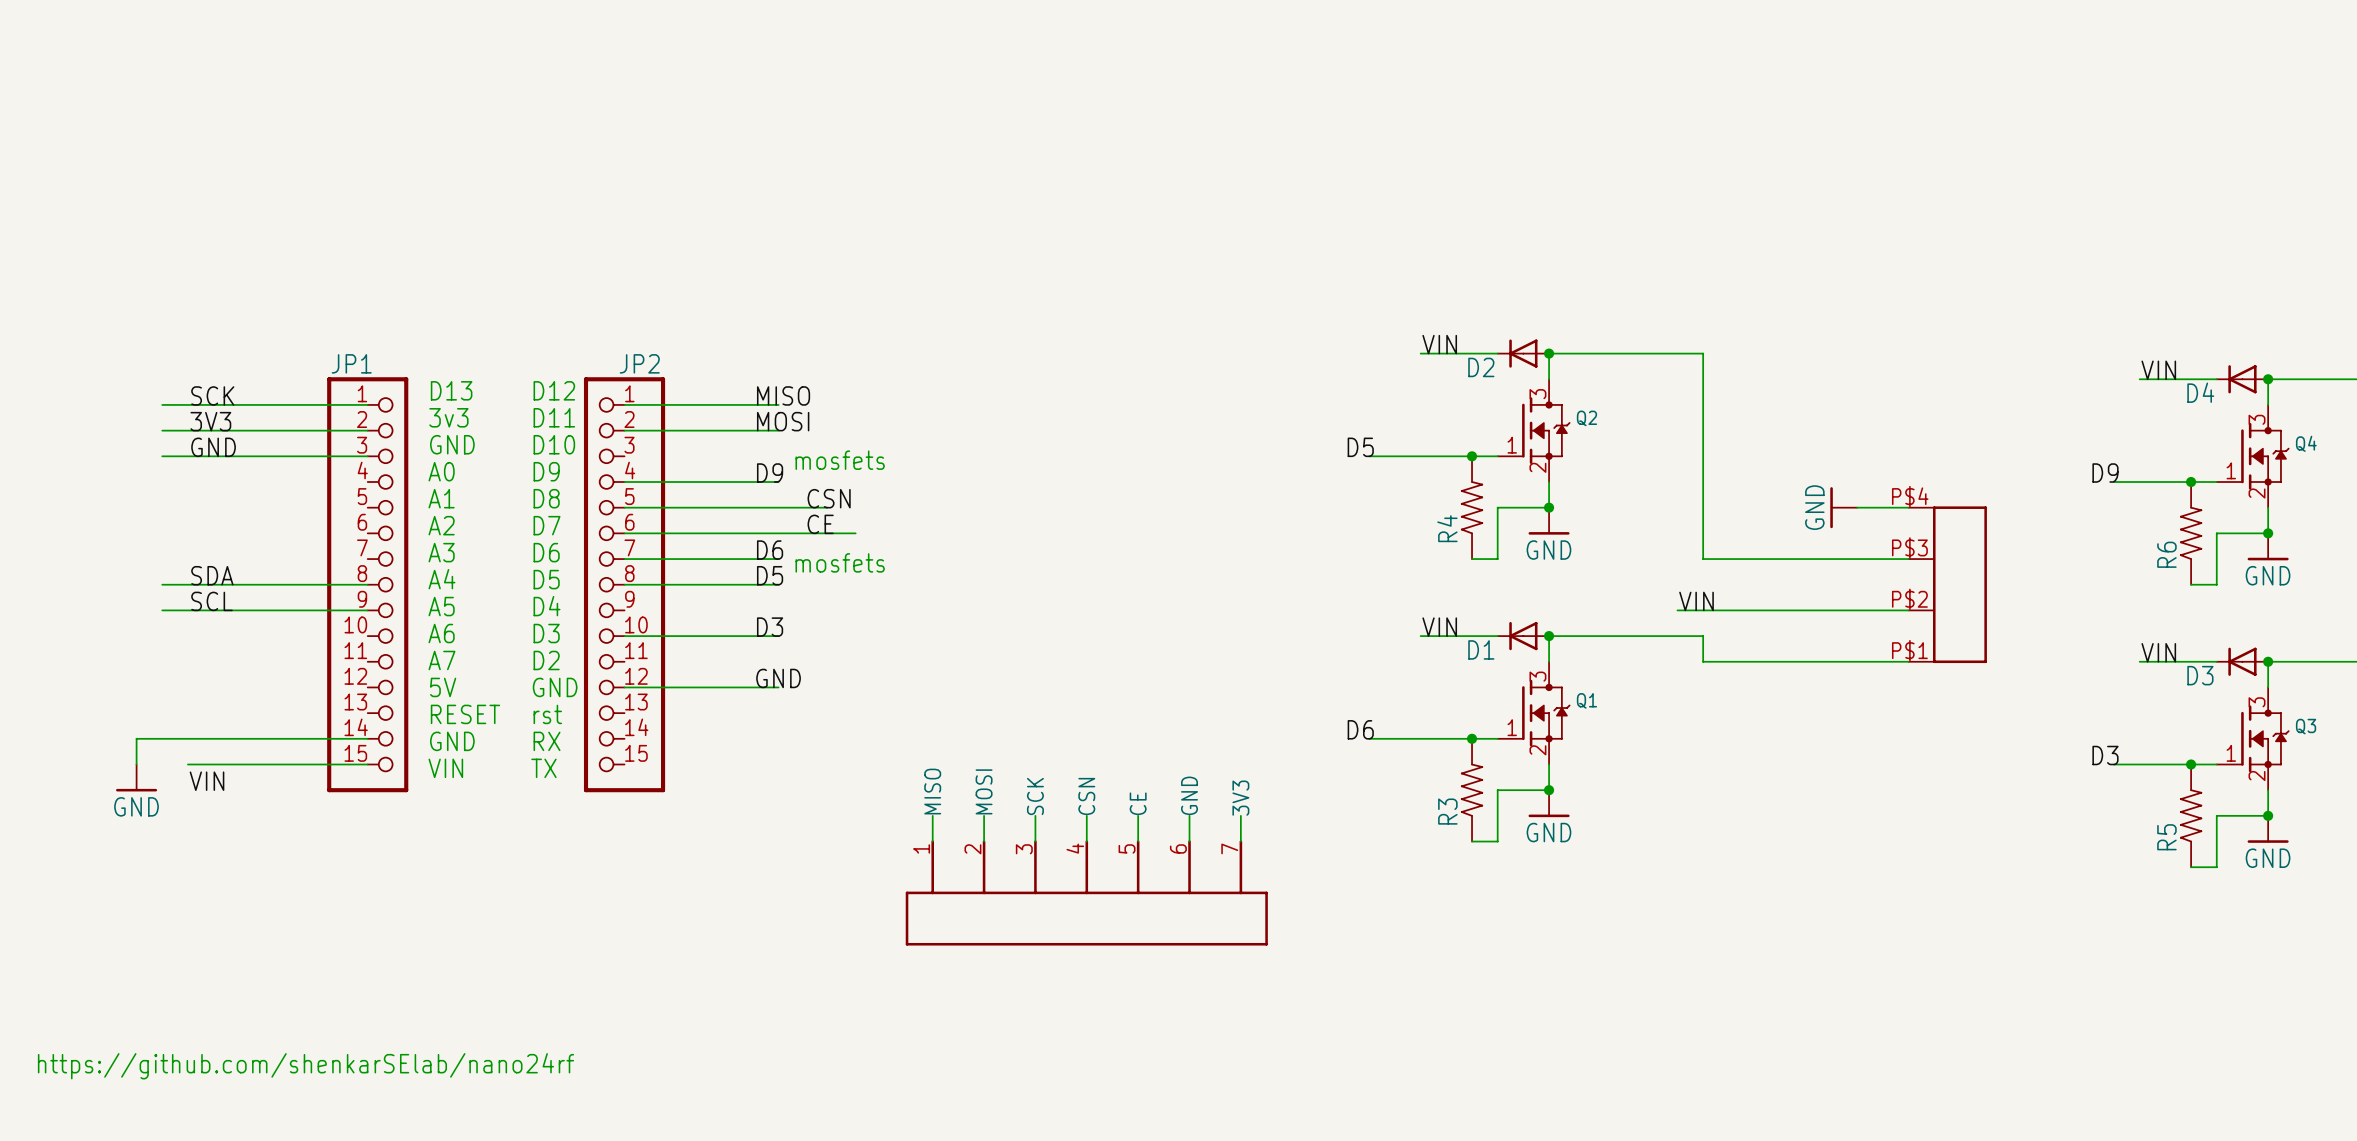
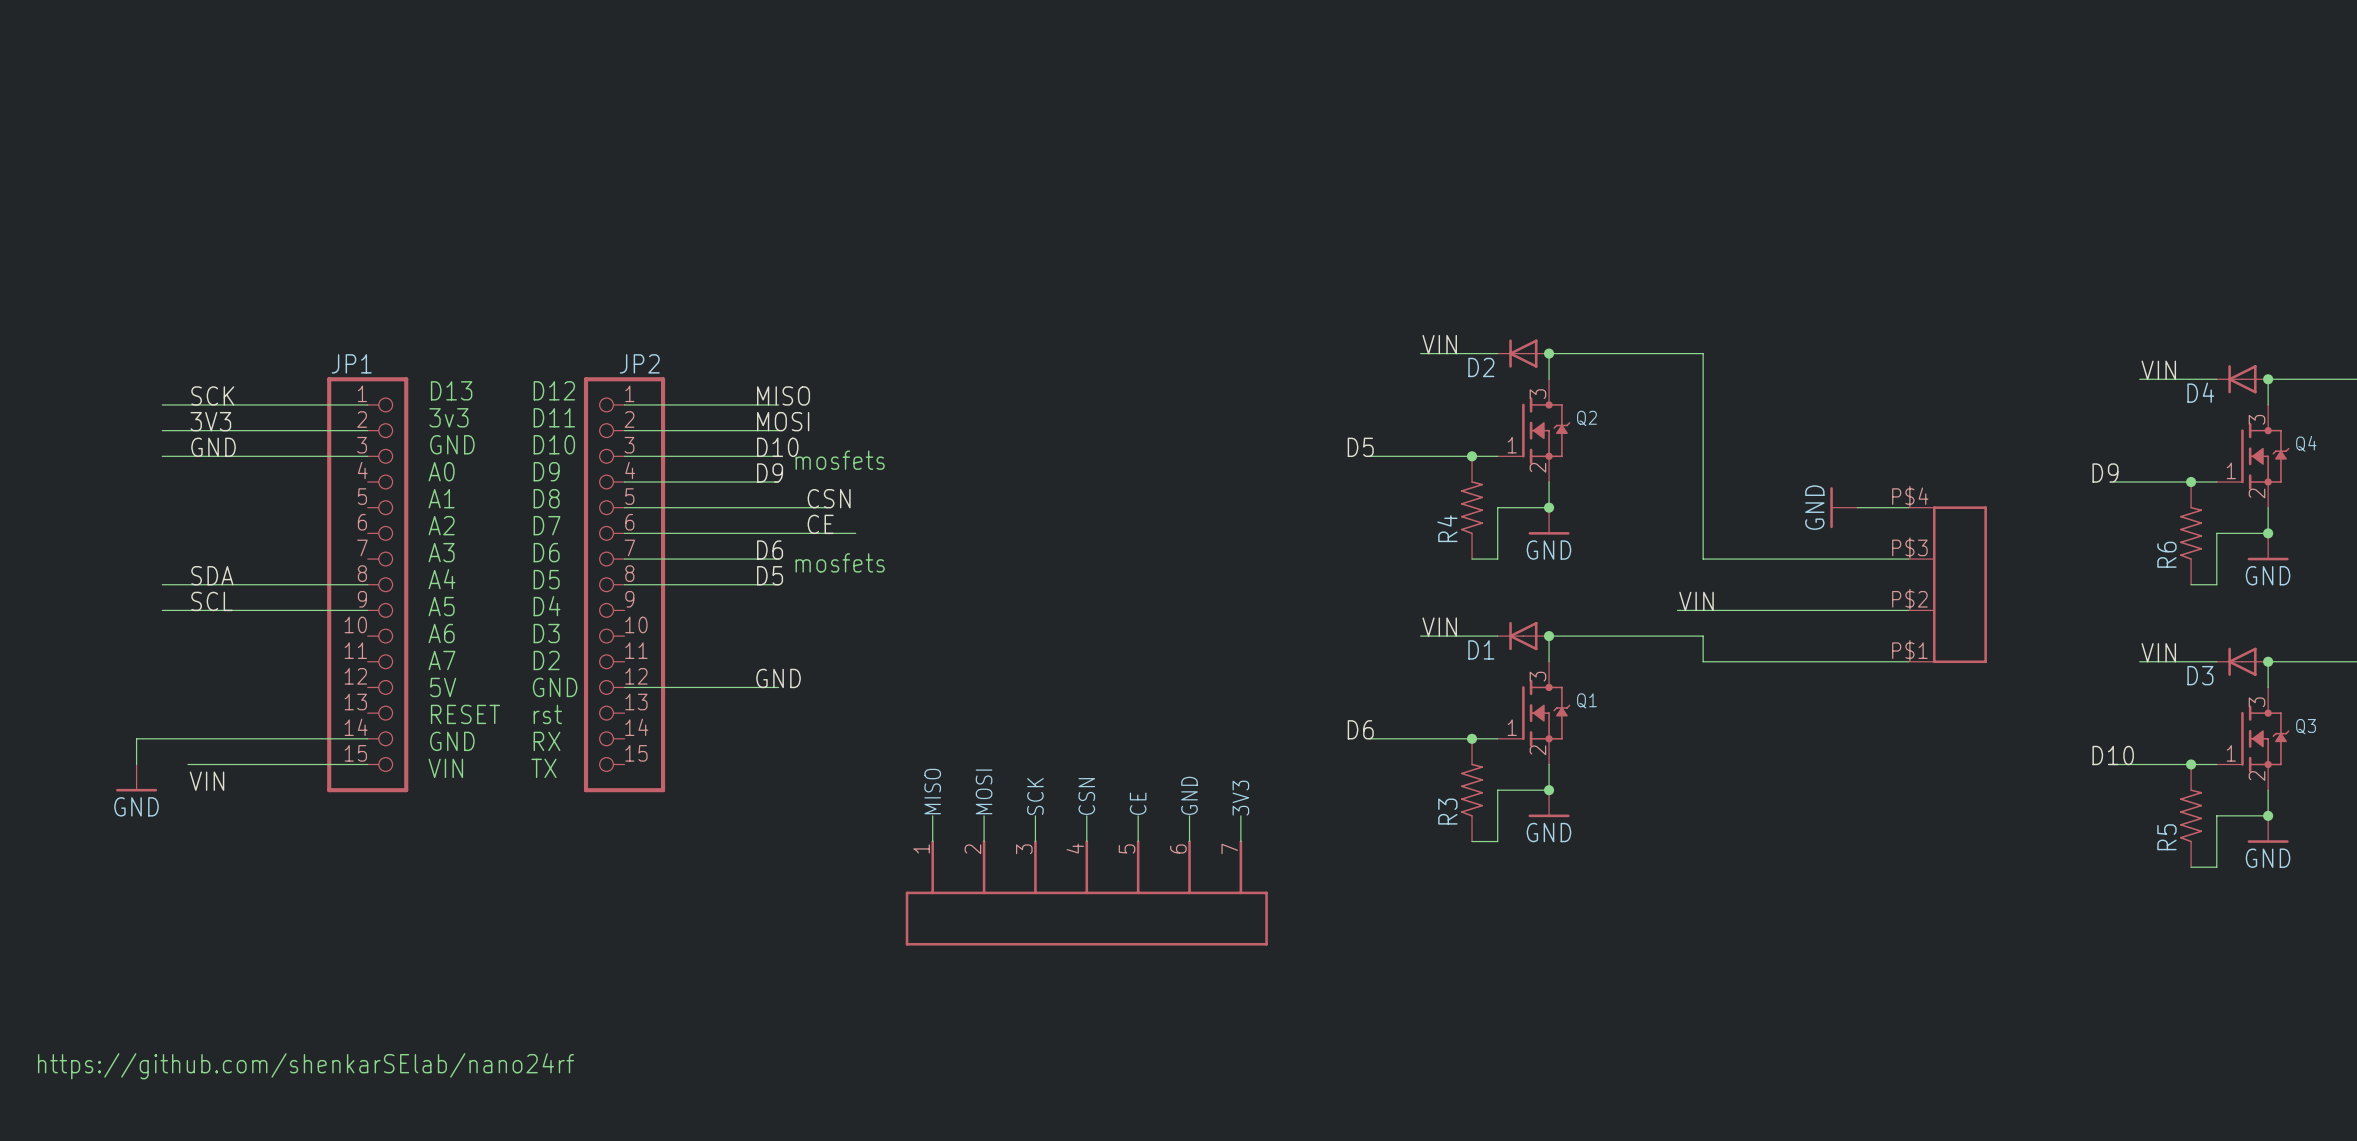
label: none -> D10 (777, 447)
label: D3 (770, 627) -> none
wire: (624, 636) (778, 636) -> (624, 456) (778, 456)
label: D3 (2105, 755) -> D10 (2113, 755)

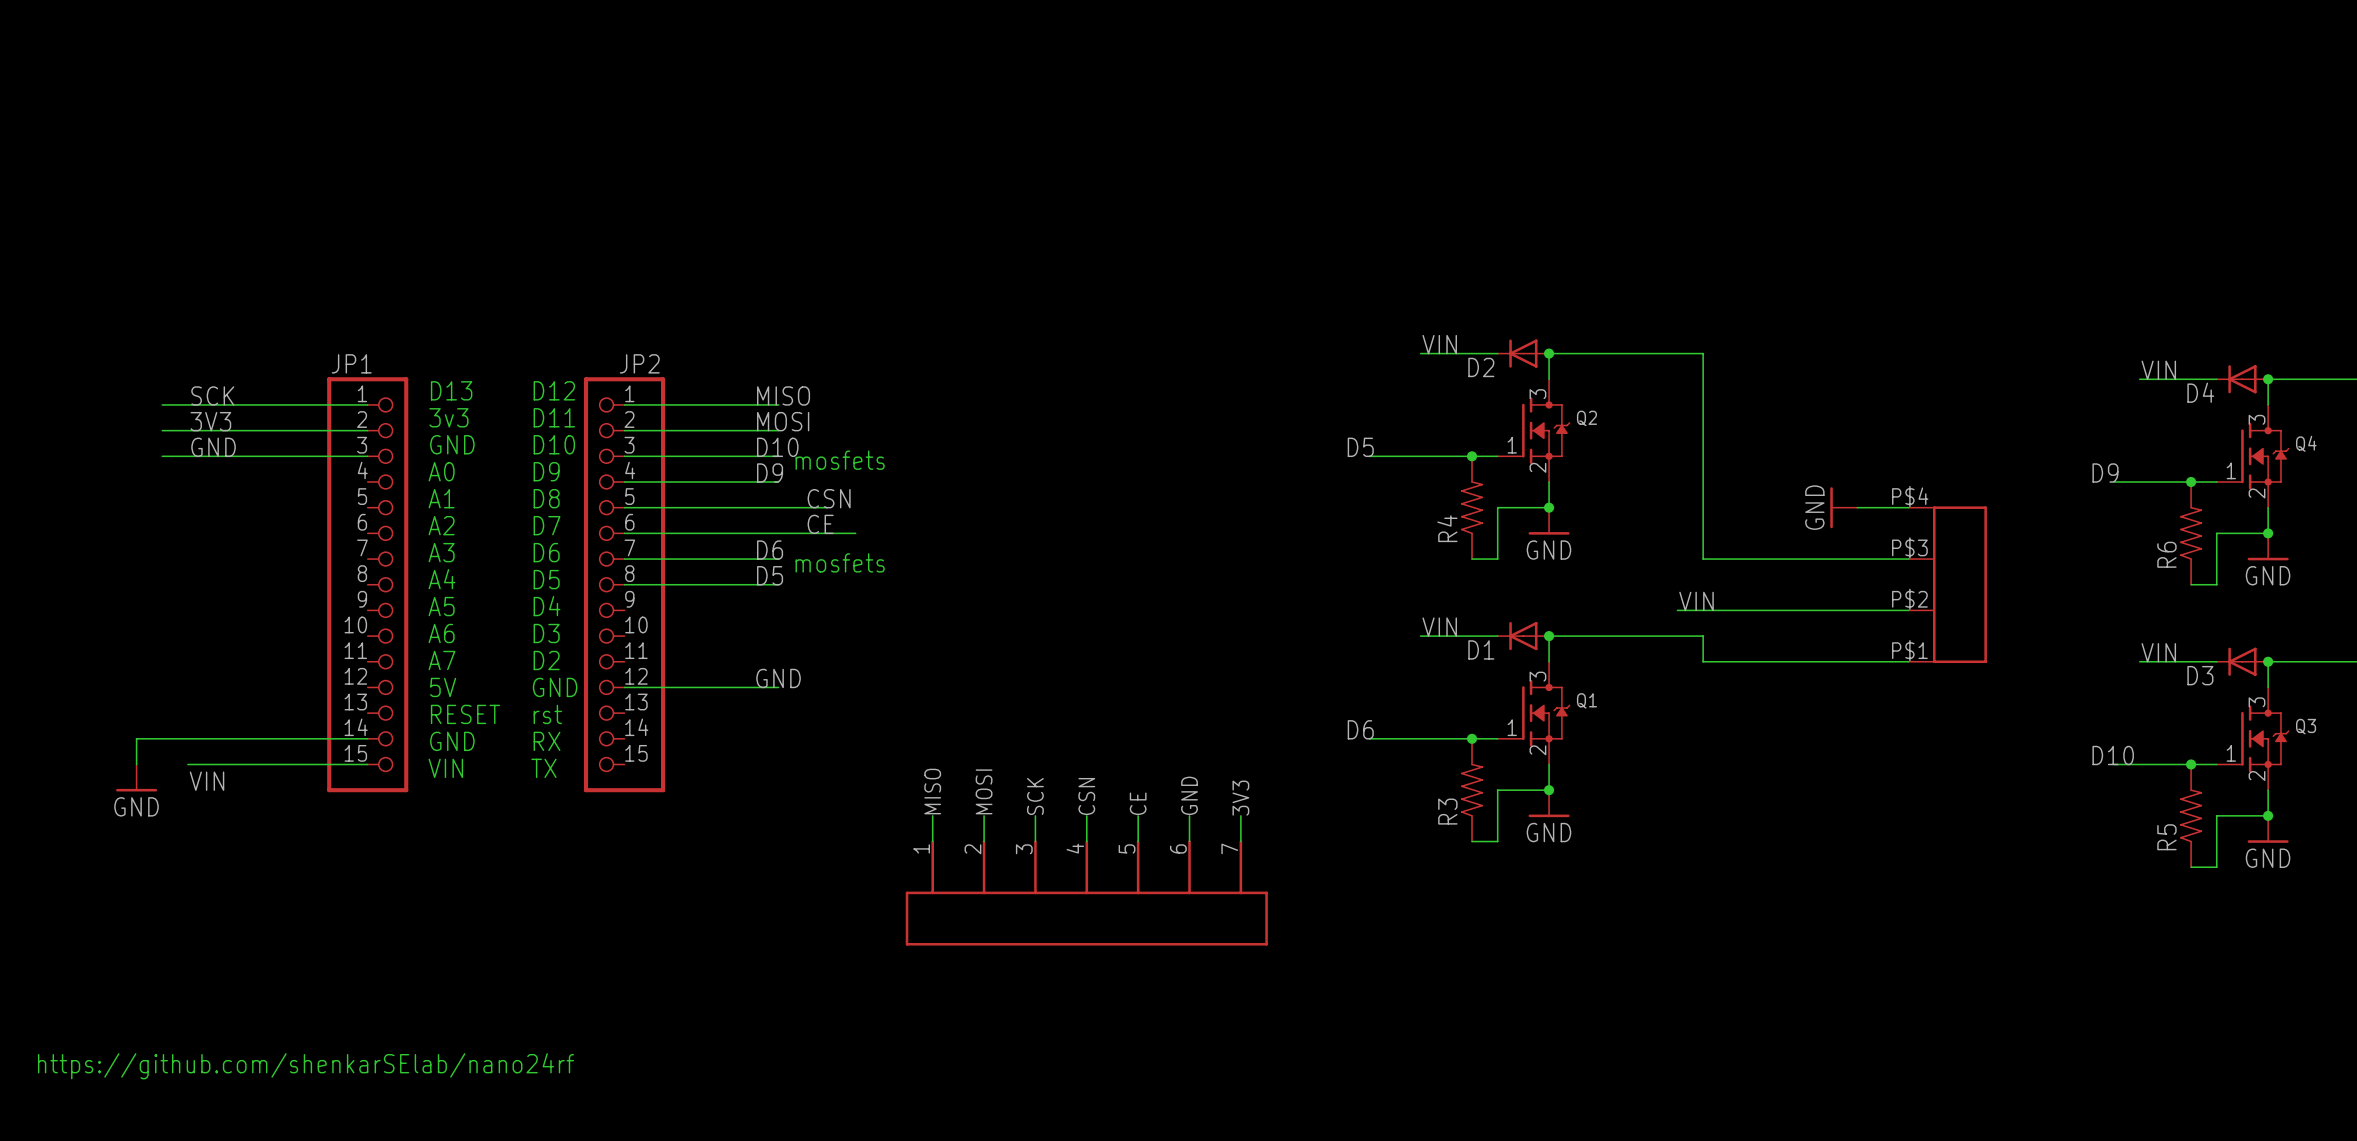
label: SDA (212, 575) -> none
wire: (162, 584) (367, 584) -> none
label: SCL (212, 601) -> none
wire: (162, 610) (367, 610) -> none

